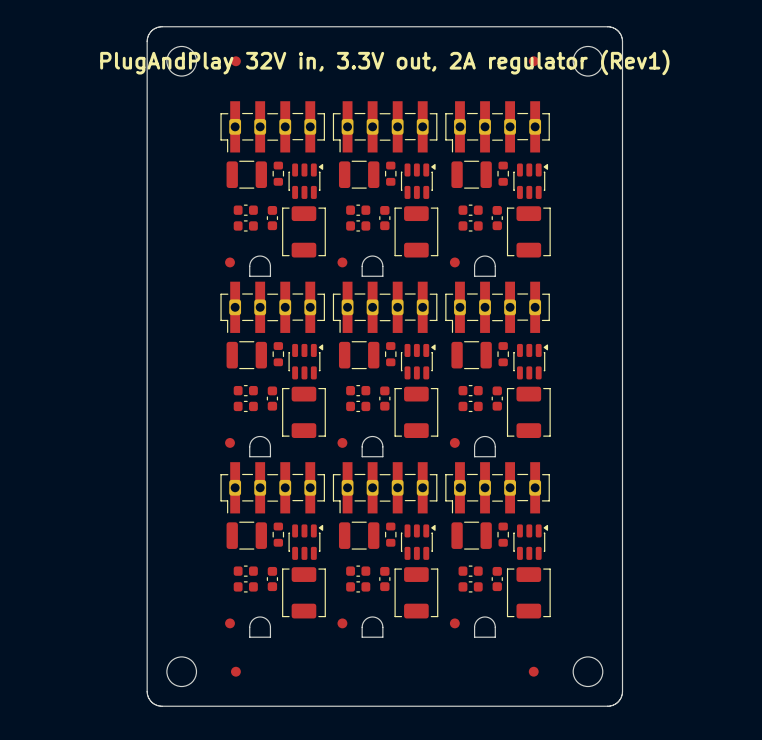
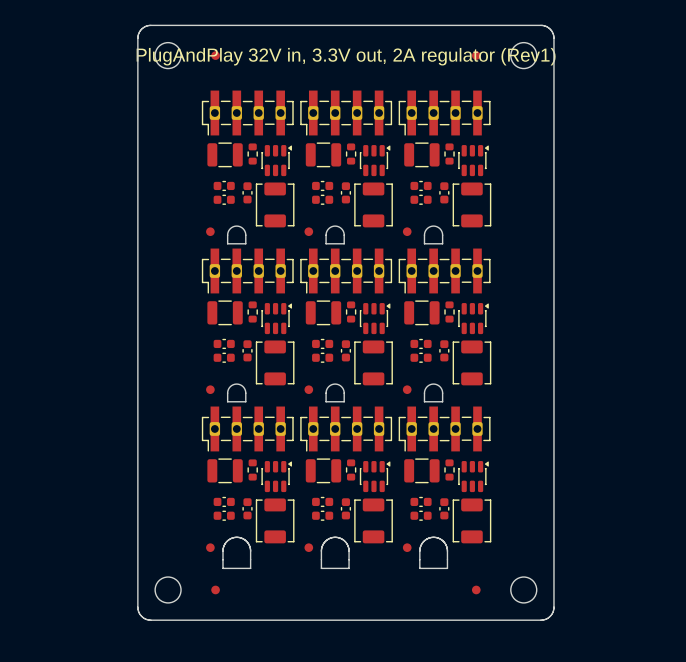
board edge: none -> (235, 537) (243, 539) (249, 545) (250, 568) (222, 568) (224, 545) (228, 539) (235, 537)
board edge: none -> (334, 537) (342, 539) (347, 545) (349, 568) (321, 568) (322, 545) (327, 539) (334, 537)
board edge: none -> (432, 537) (425, 539) (420, 545) (419, 568) (447, 568) (446, 545) (440, 539) (432, 537)
board edge: (249, 627) (249, 637) (270, 637) (270, 624) (264, 618) (254, 618) (249, 627) -> none
board edge: (362, 627) (362, 637) (382, 637) (382, 624) (376, 617) (367, 618) (362, 627) -> none
board edge: (474, 627) (474, 637) (495, 637) (494, 624) (488, 617) (478, 619) (474, 627) -> none

